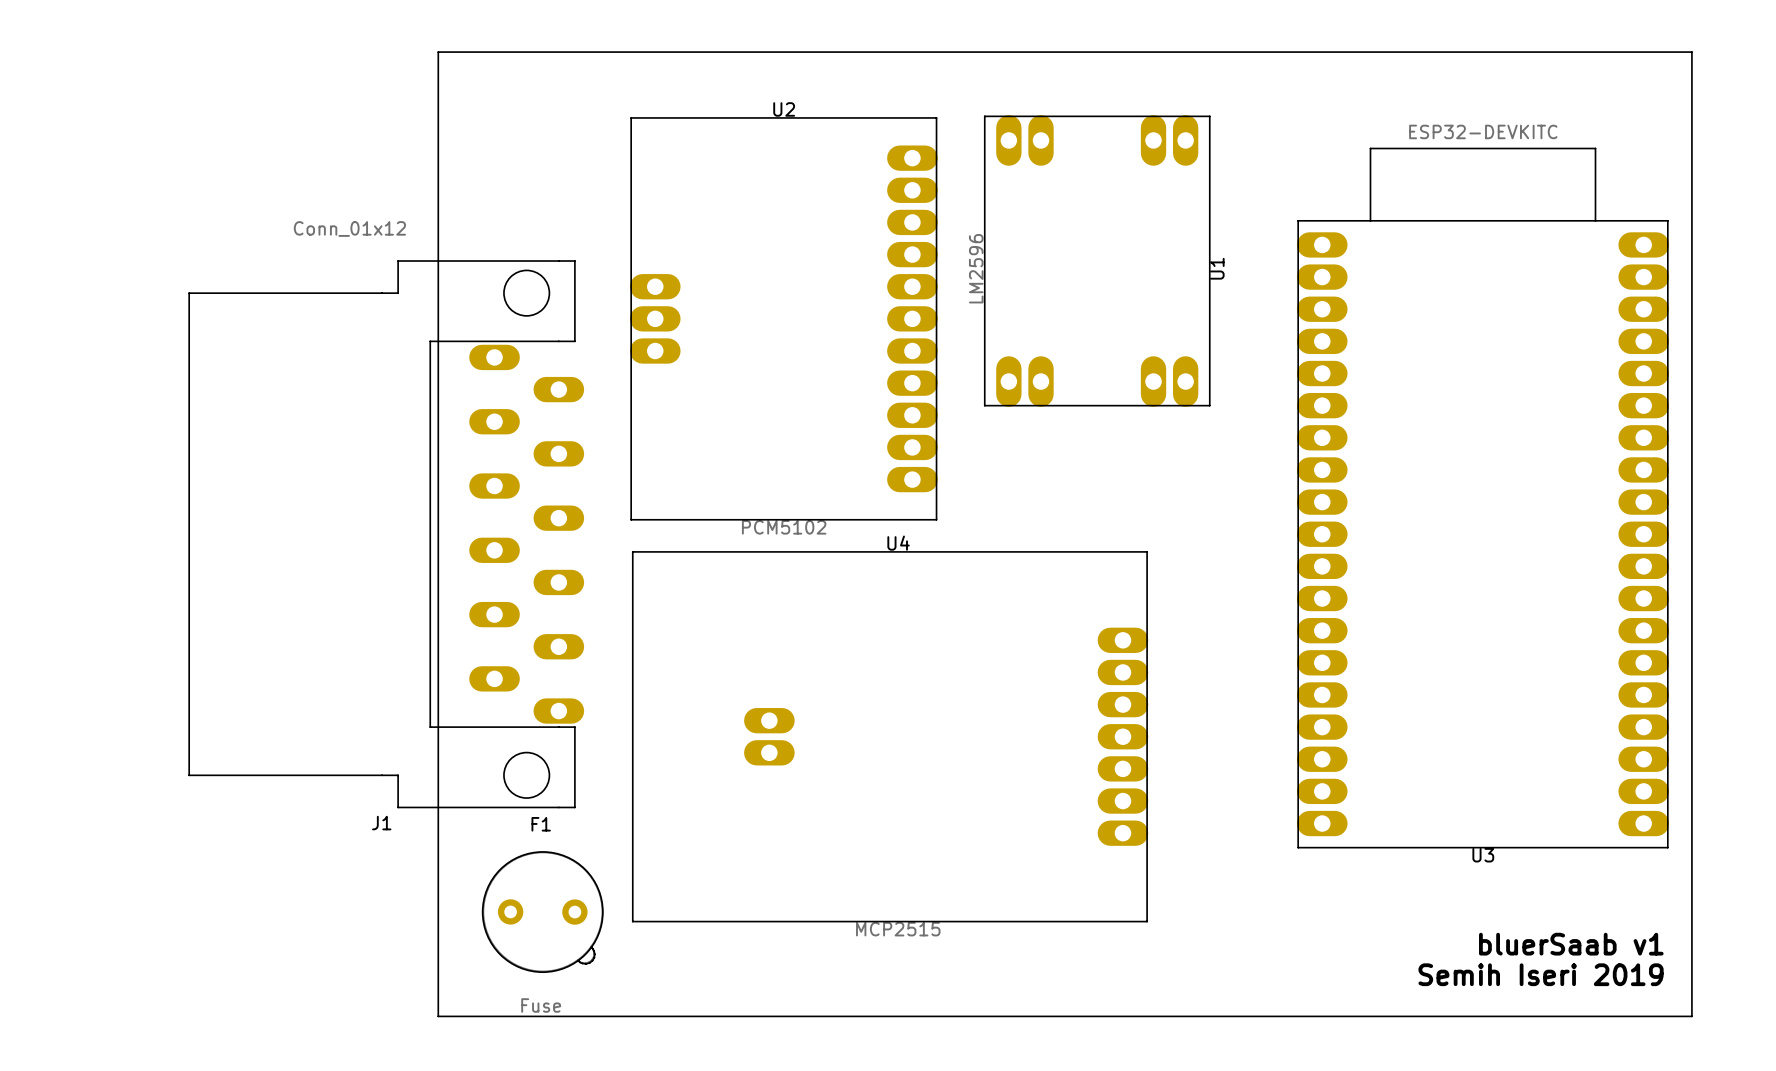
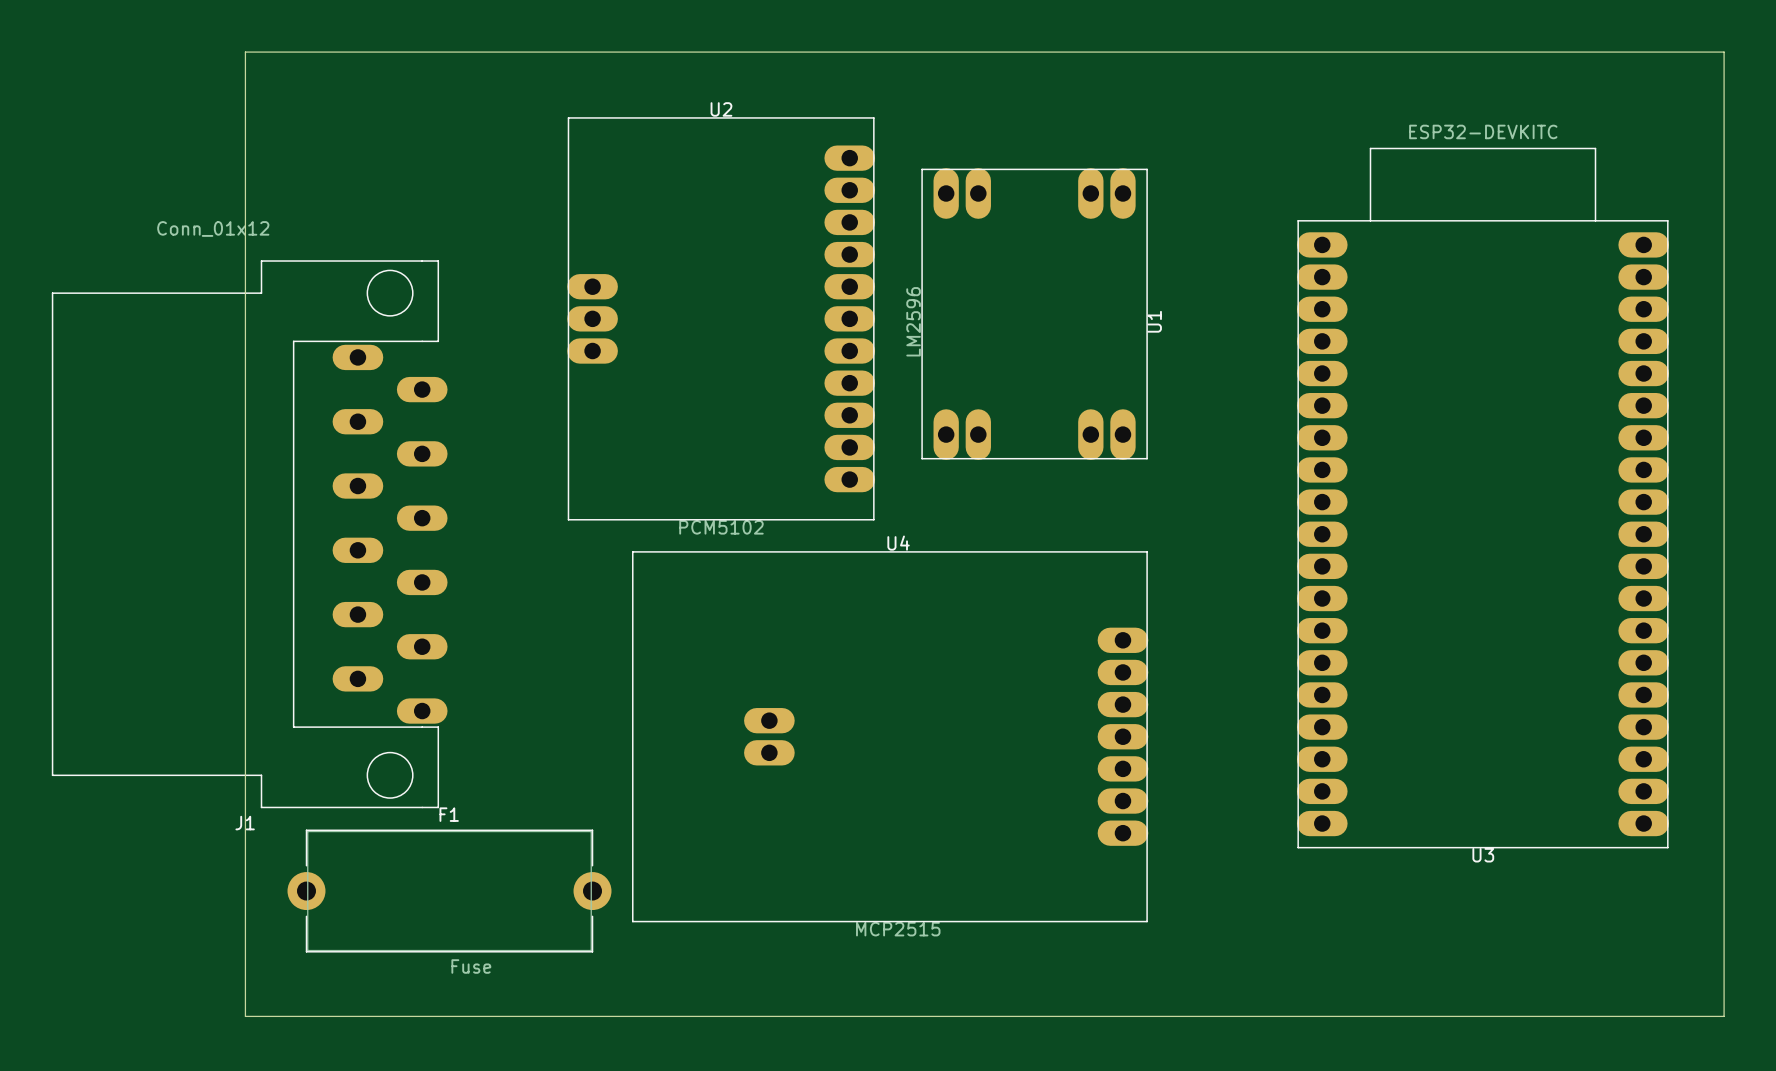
board edge: (438, 52) (438, 1016) -> (438, 52) (245, 52) (245, 1016) (438, 1016)
board edge: (1691, 52) (1691, 1016) -> (1691, 52) (1724, 52) (1724, 1016) (1691, 1016)
U1 position: (1097, 261) -> (1034, 314)
U2 position: (783, 318) -> (721, 318)
J1 position: (386, 534) -> (249, 534)
F1 footprint: [481, 851, 604, 973] -> [287, 829, 612, 953]
text: bluerSaab v1 (1571, 944) -> none
text: Semih Iseri 2019 (1541, 974) -> none
F1 value position: Fuse (541, 1005) -> Fuse (471, 966)

